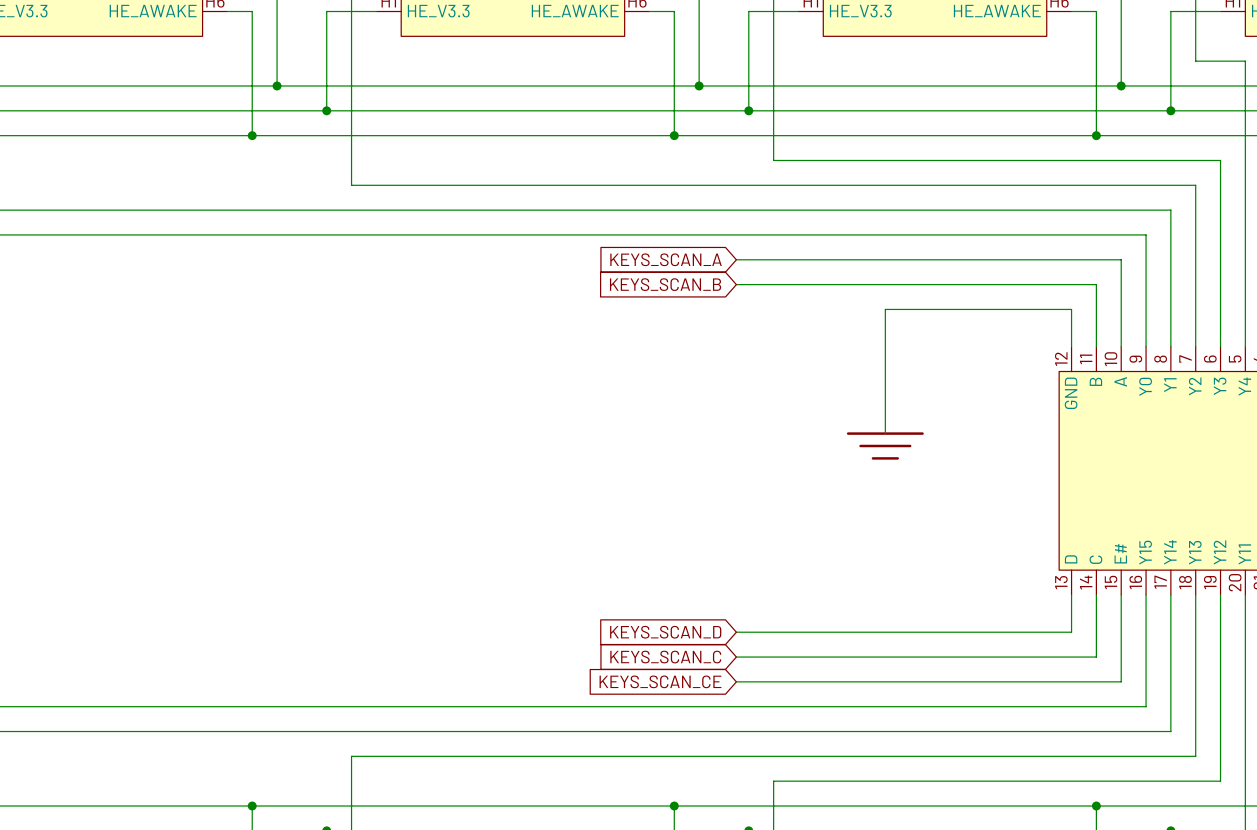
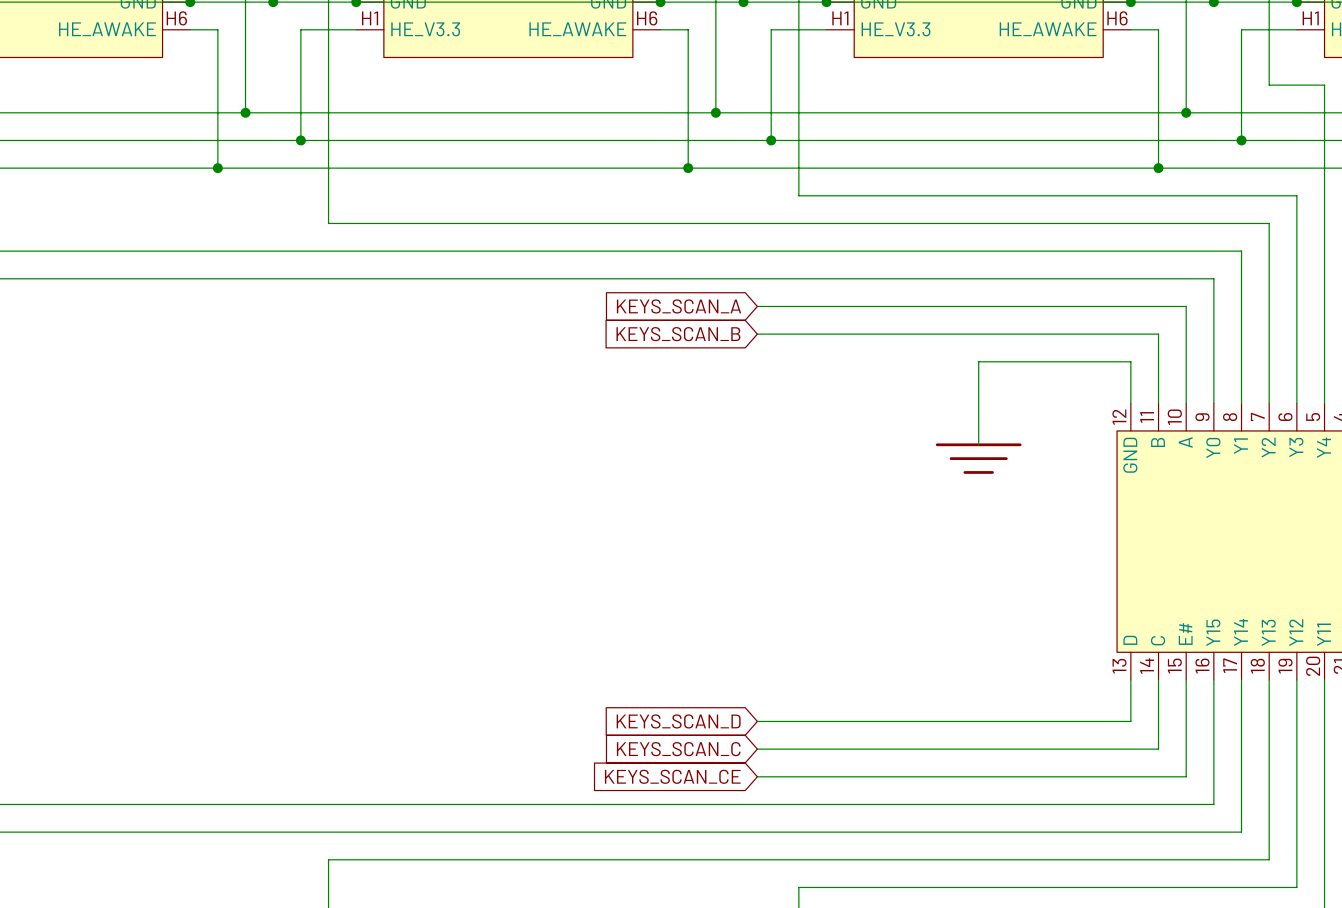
wire: (935, 309) (885, 309) (885, 433) -> (978, 361) (978, 444)
power symbol position: (885, 446) -> (978, 458)

